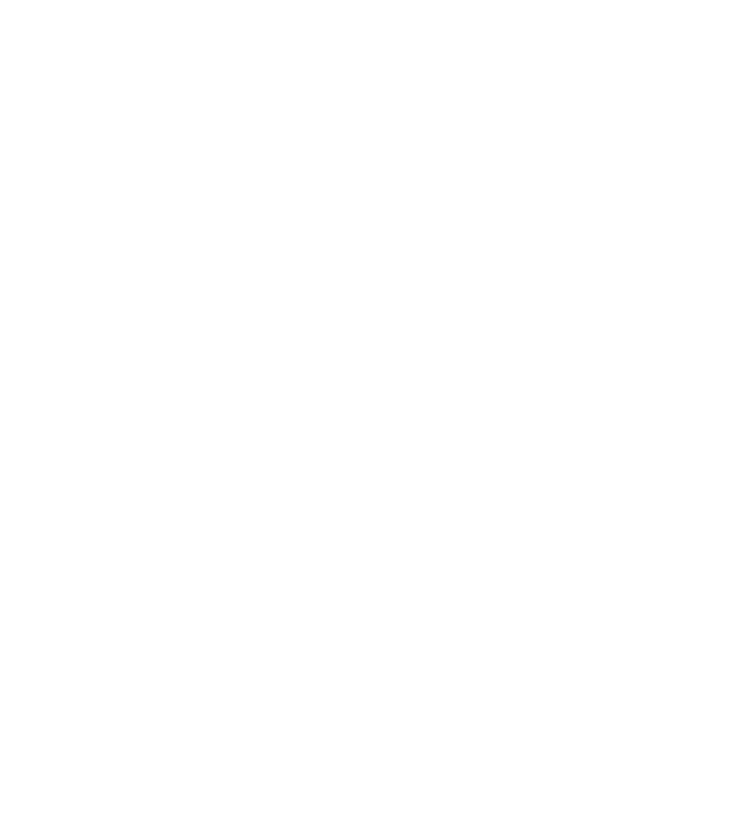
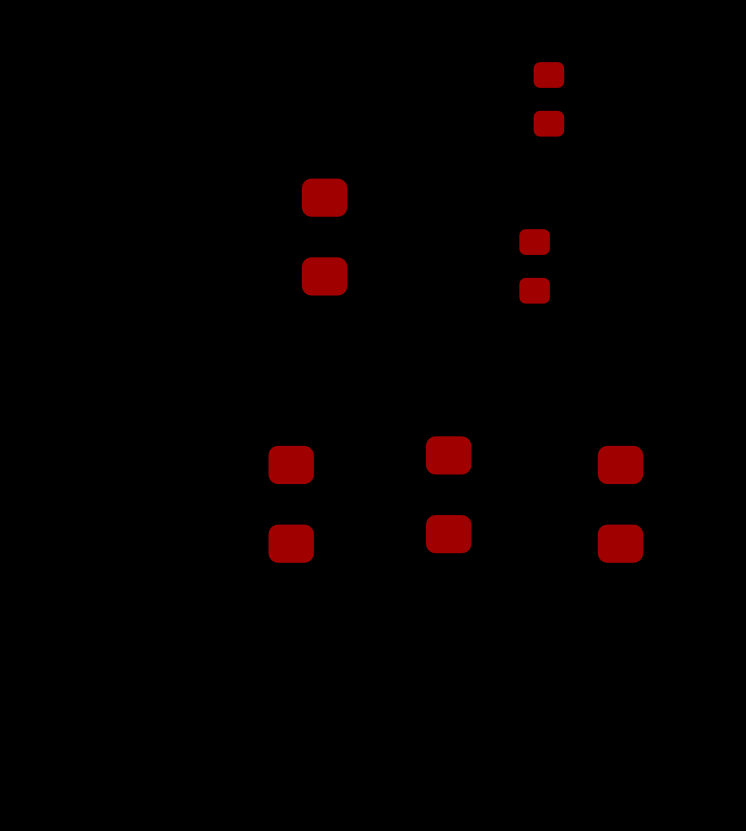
part: none -> (548, 99)
part: none -> (324, 237)
part: none -> (534, 266)
part: none -> (448, 494)
part: none -> (291, 504)
part: none -> (620, 504)

